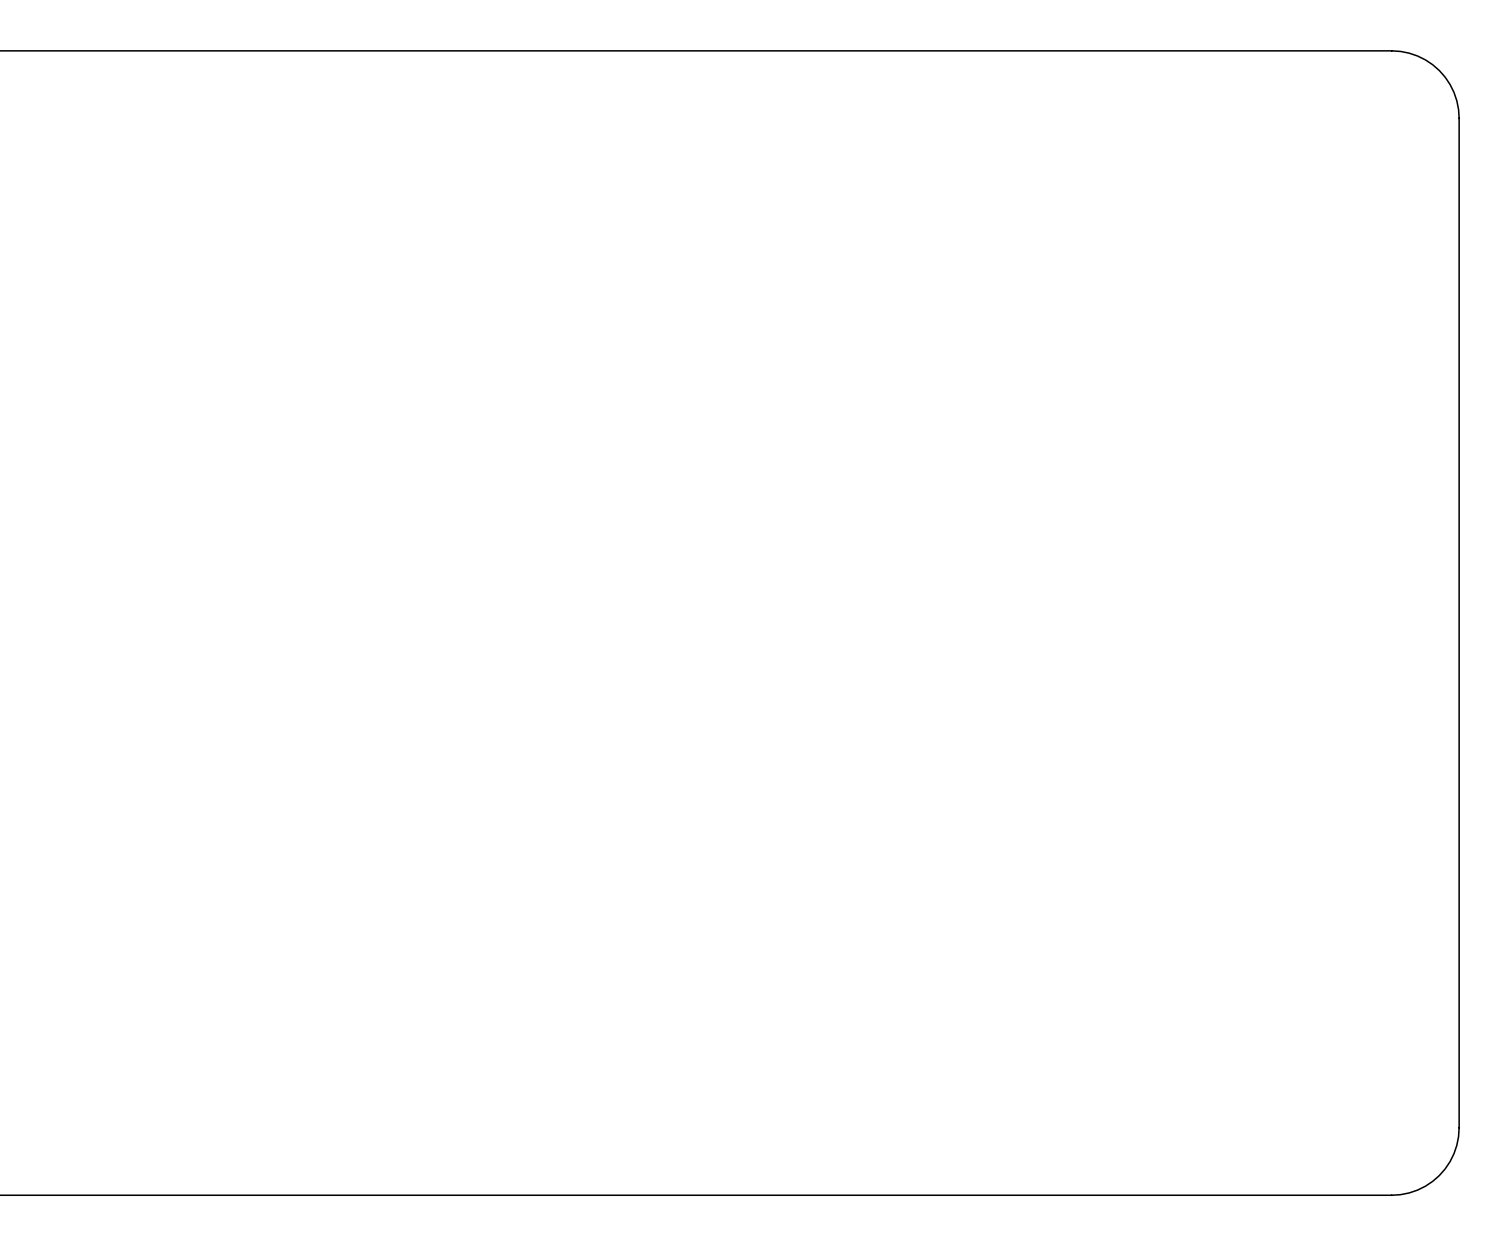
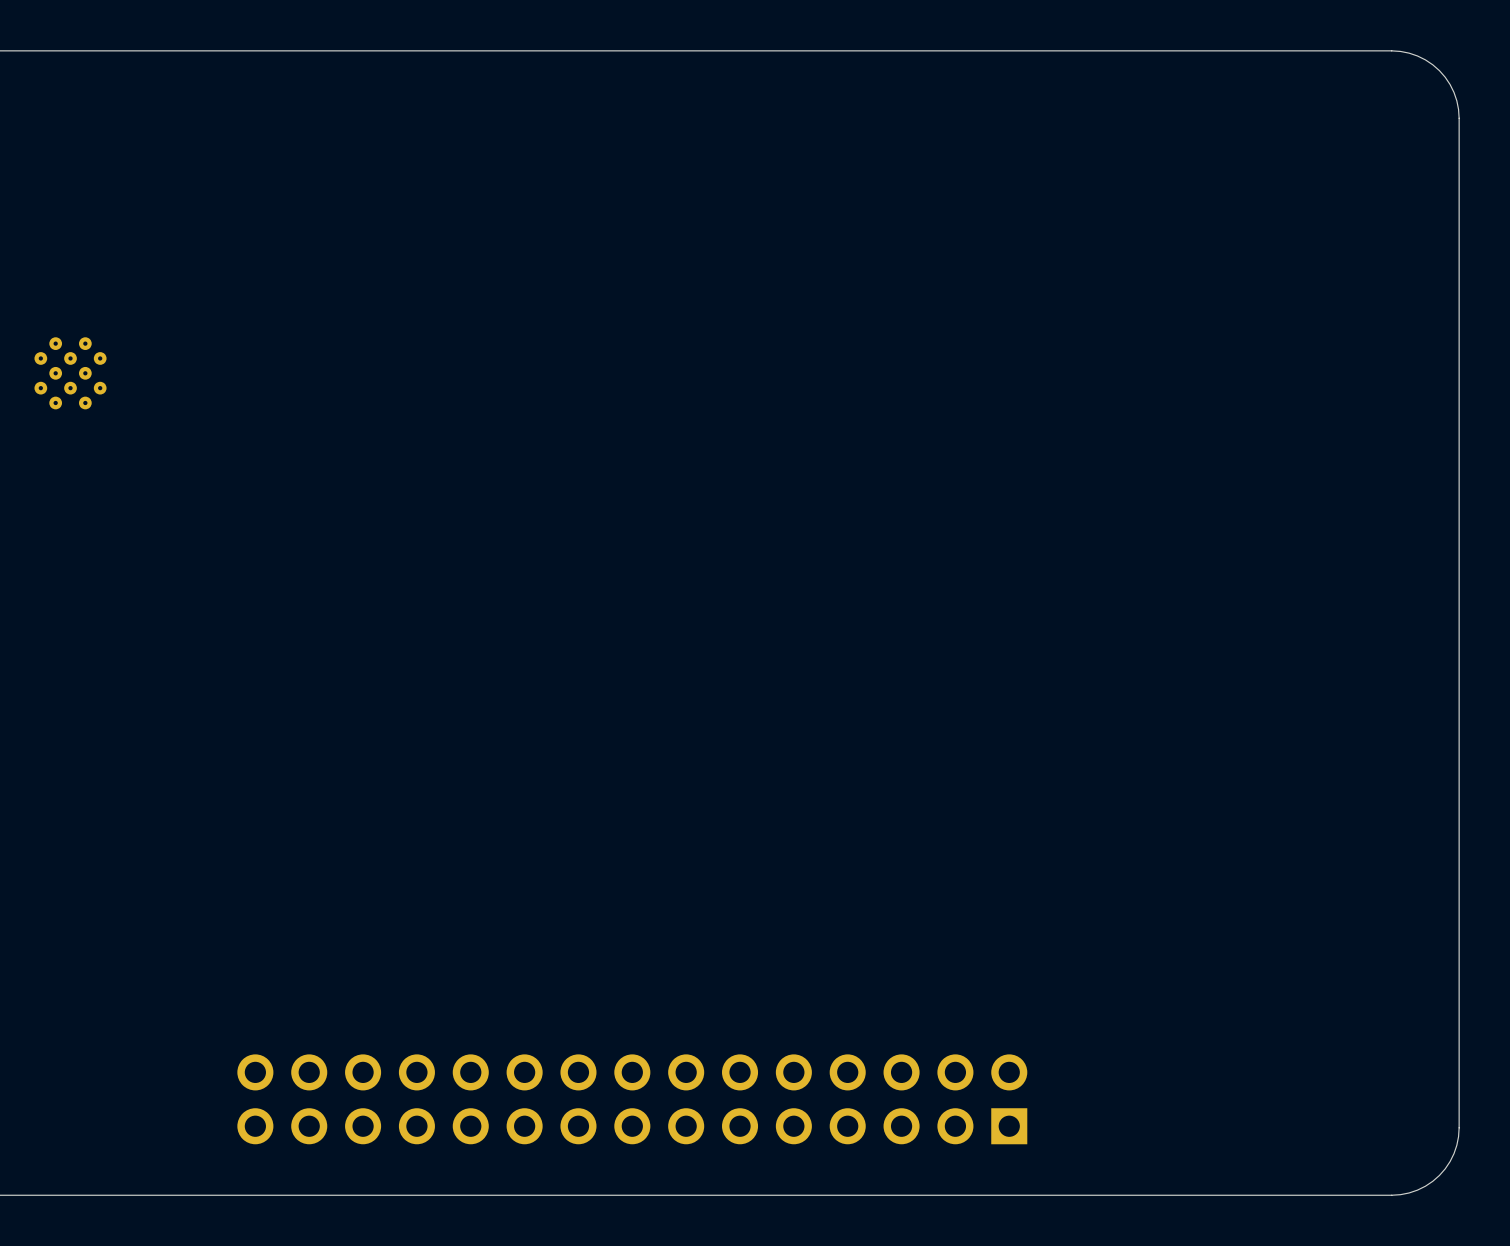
part: none -> (70, 373)
part: none -> (632, 1099)

